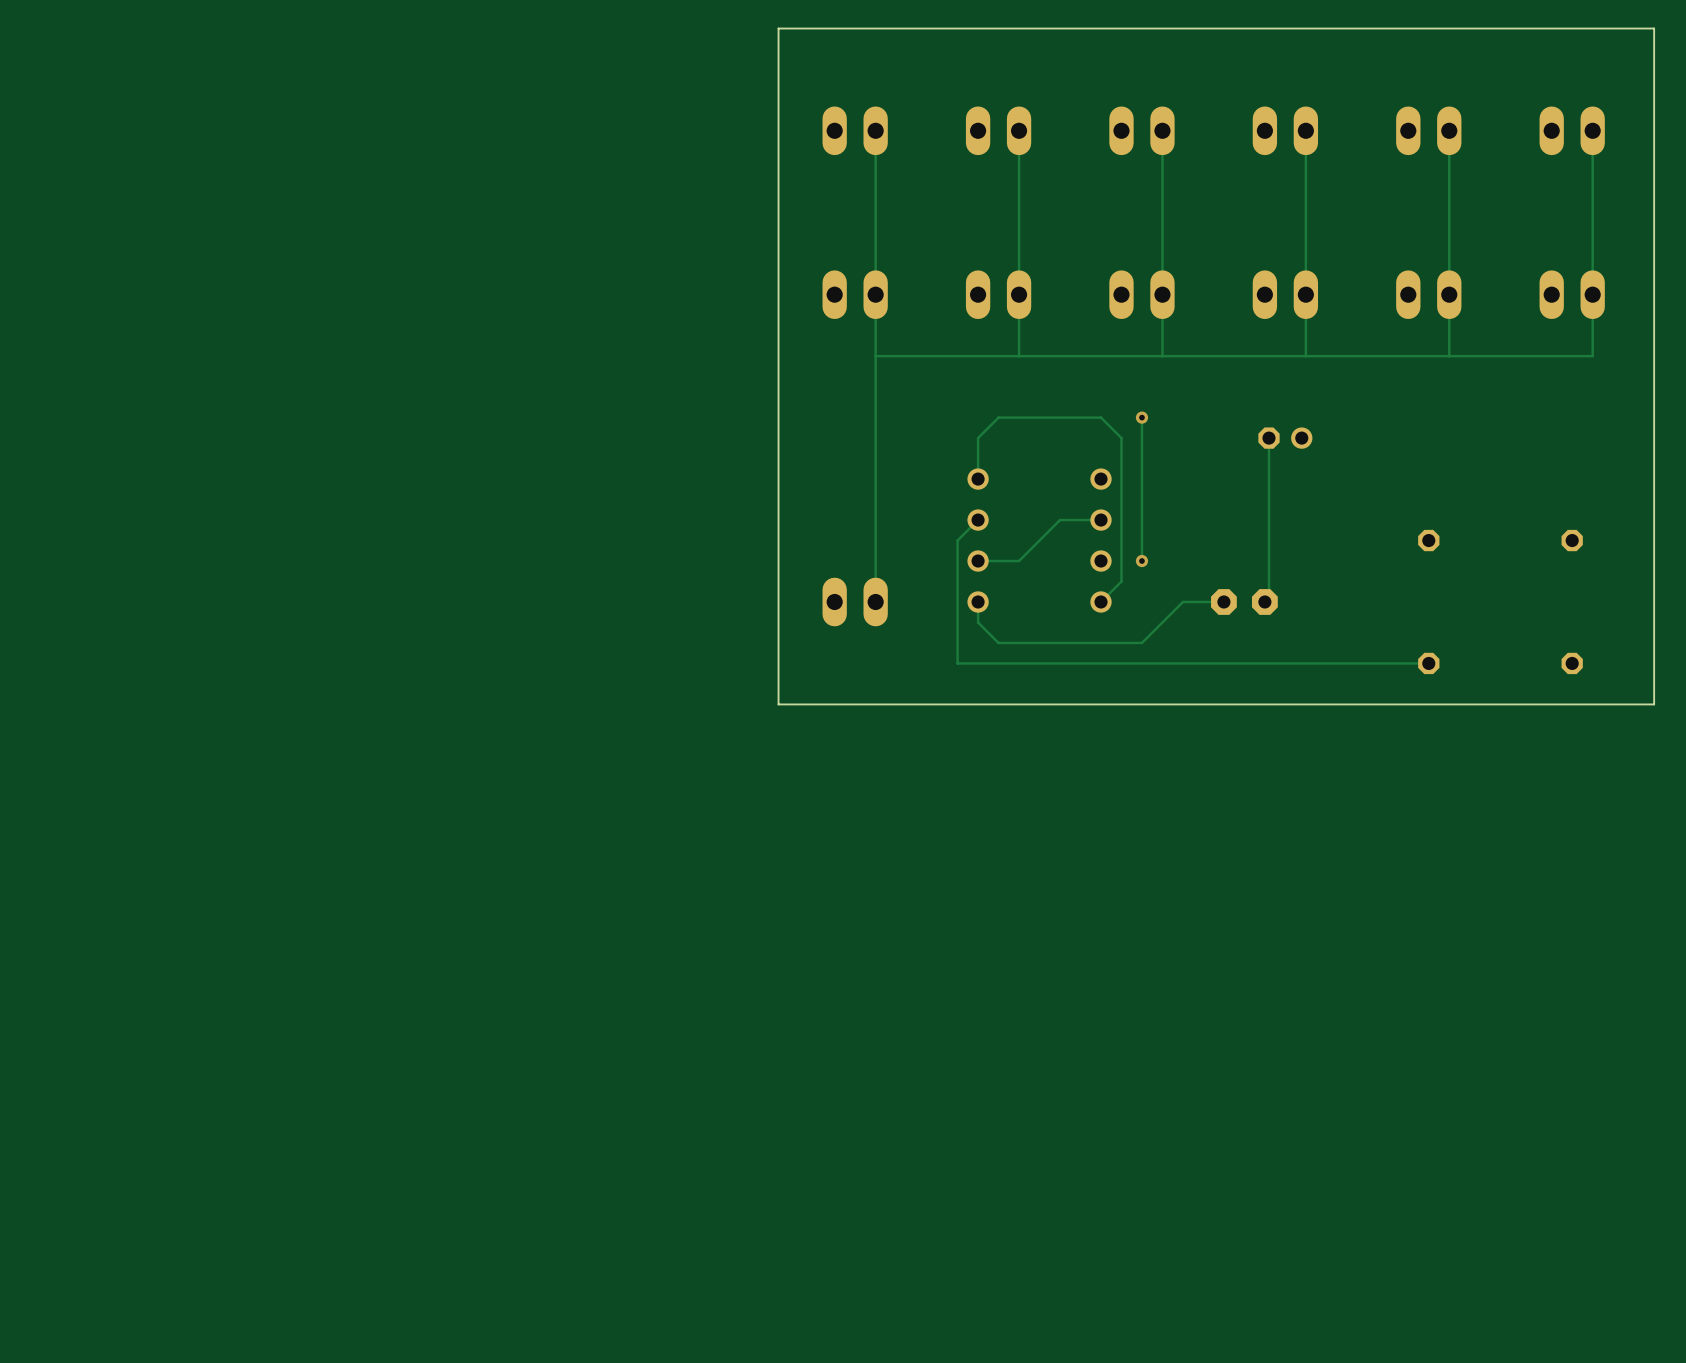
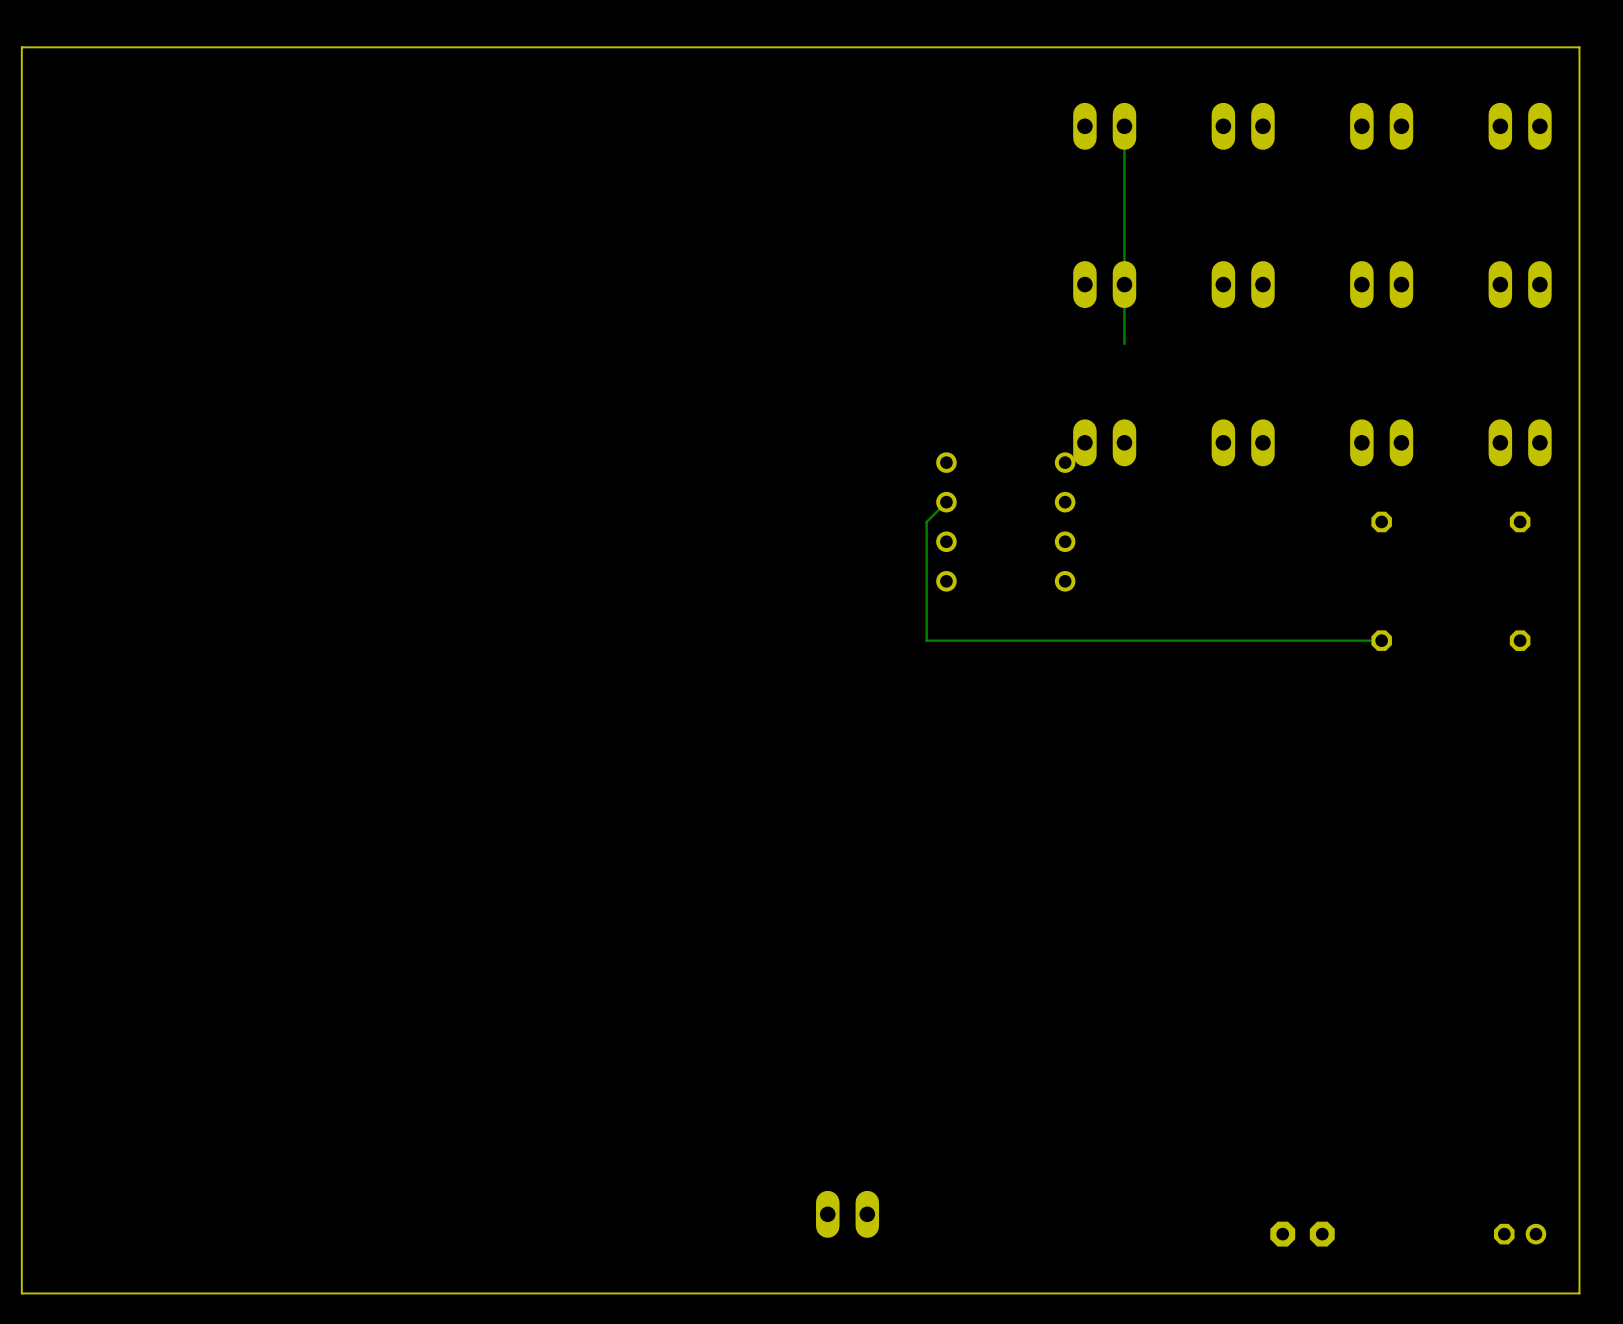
board edge: (1654, 28) (778, 28) (778, 704) (1654, 704) (1654, 28) -> none
board edge: none -> (1579, 47) (21, 47) (21, 1293) (1579, 1293) (1579, 47)
part: (855, 130) -> none
track: (875, 130) (875, 601) -> none
part: (998, 130) -> none
track: (1019, 130) (1019, 356) -> none
track: (1305, 130) (1305, 356) -> none
track: (1449, 130) (1449, 356) -> none
track: (1592, 130) (1592, 356) (875, 356) -> none
part: (855, 294) -> none
part: (998, 294) -> none
track: (1141, 417) (1141, 561) -> none
via: (1141, 417) -> none
track: (1268, 438) (1268, 597) (1264, 601) -> none
part: (1285, 438) -> none
part: none -> (1104, 442)
part: none -> (1243, 442)
part: none -> (1381, 442)
part: none -> (1520, 442)
track: (978, 479) (978, 438) (998, 417) (1101, 417) (1121, 438) (1121, 581) (1101, 601) -> none
track: (1101, 520) (1060, 520) (1019, 561) (978, 561) -> none
via: (1141, 561) -> none
part: (855, 601) -> none
track: (1223, 601) (1182, 601) (1141, 642) (998, 642) (978, 622) (978, 601) -> none
part: (1244, 601) -> none
part: none -> (847, 1214)
part: none -> (1302, 1234)
part: none -> (1520, 1234)

